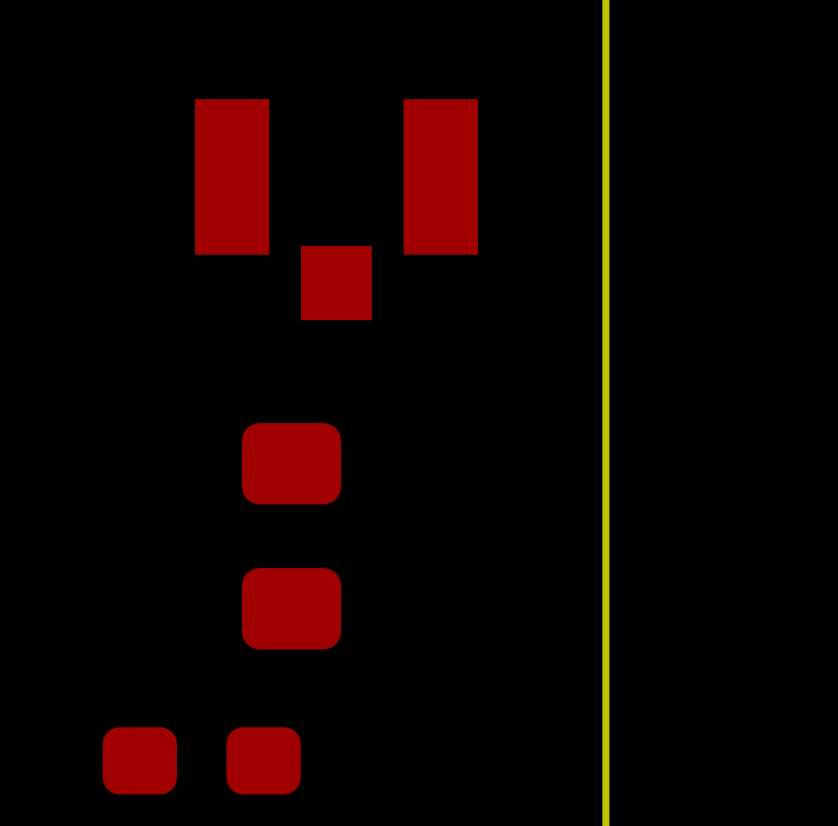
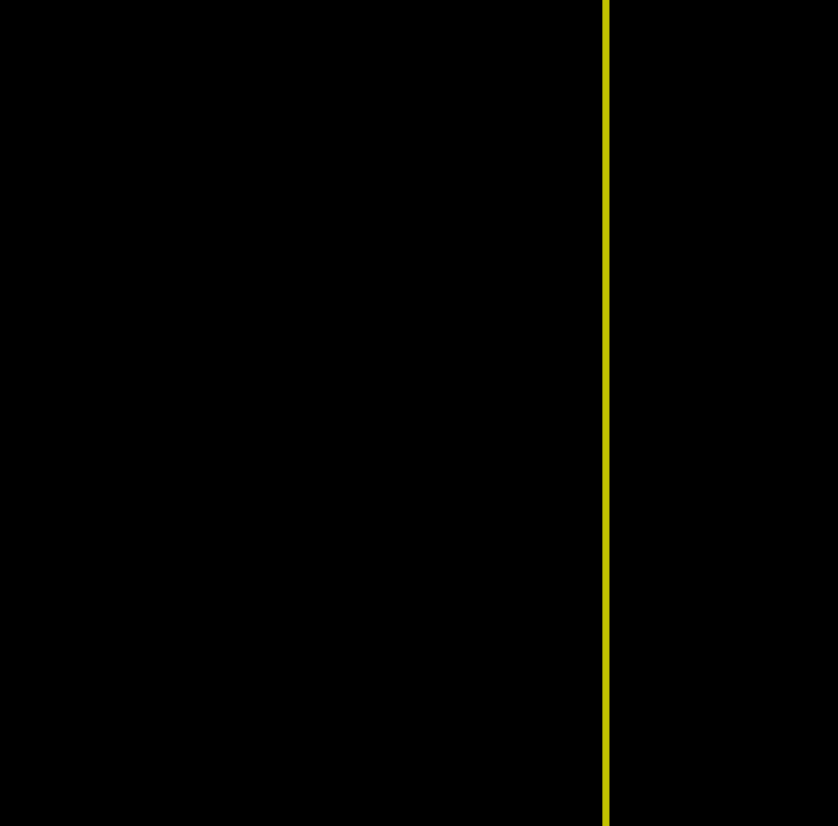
part: (336, 209) -> none
part: (291, 536) -> none
part: (201, 760) -> none

